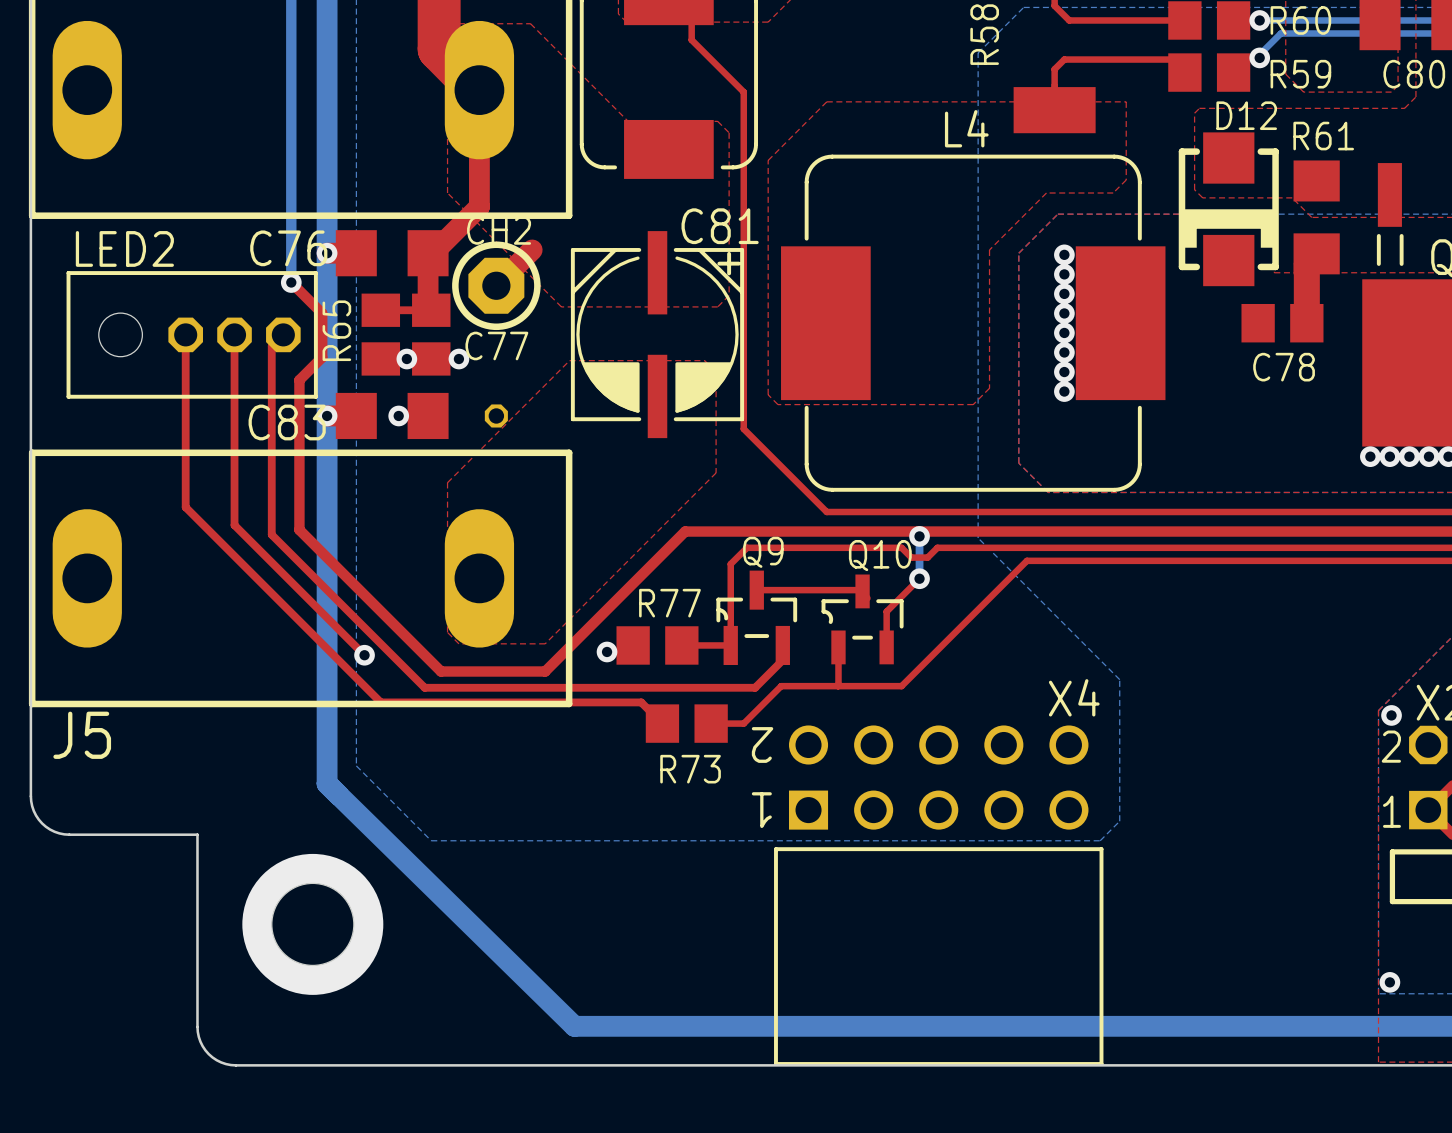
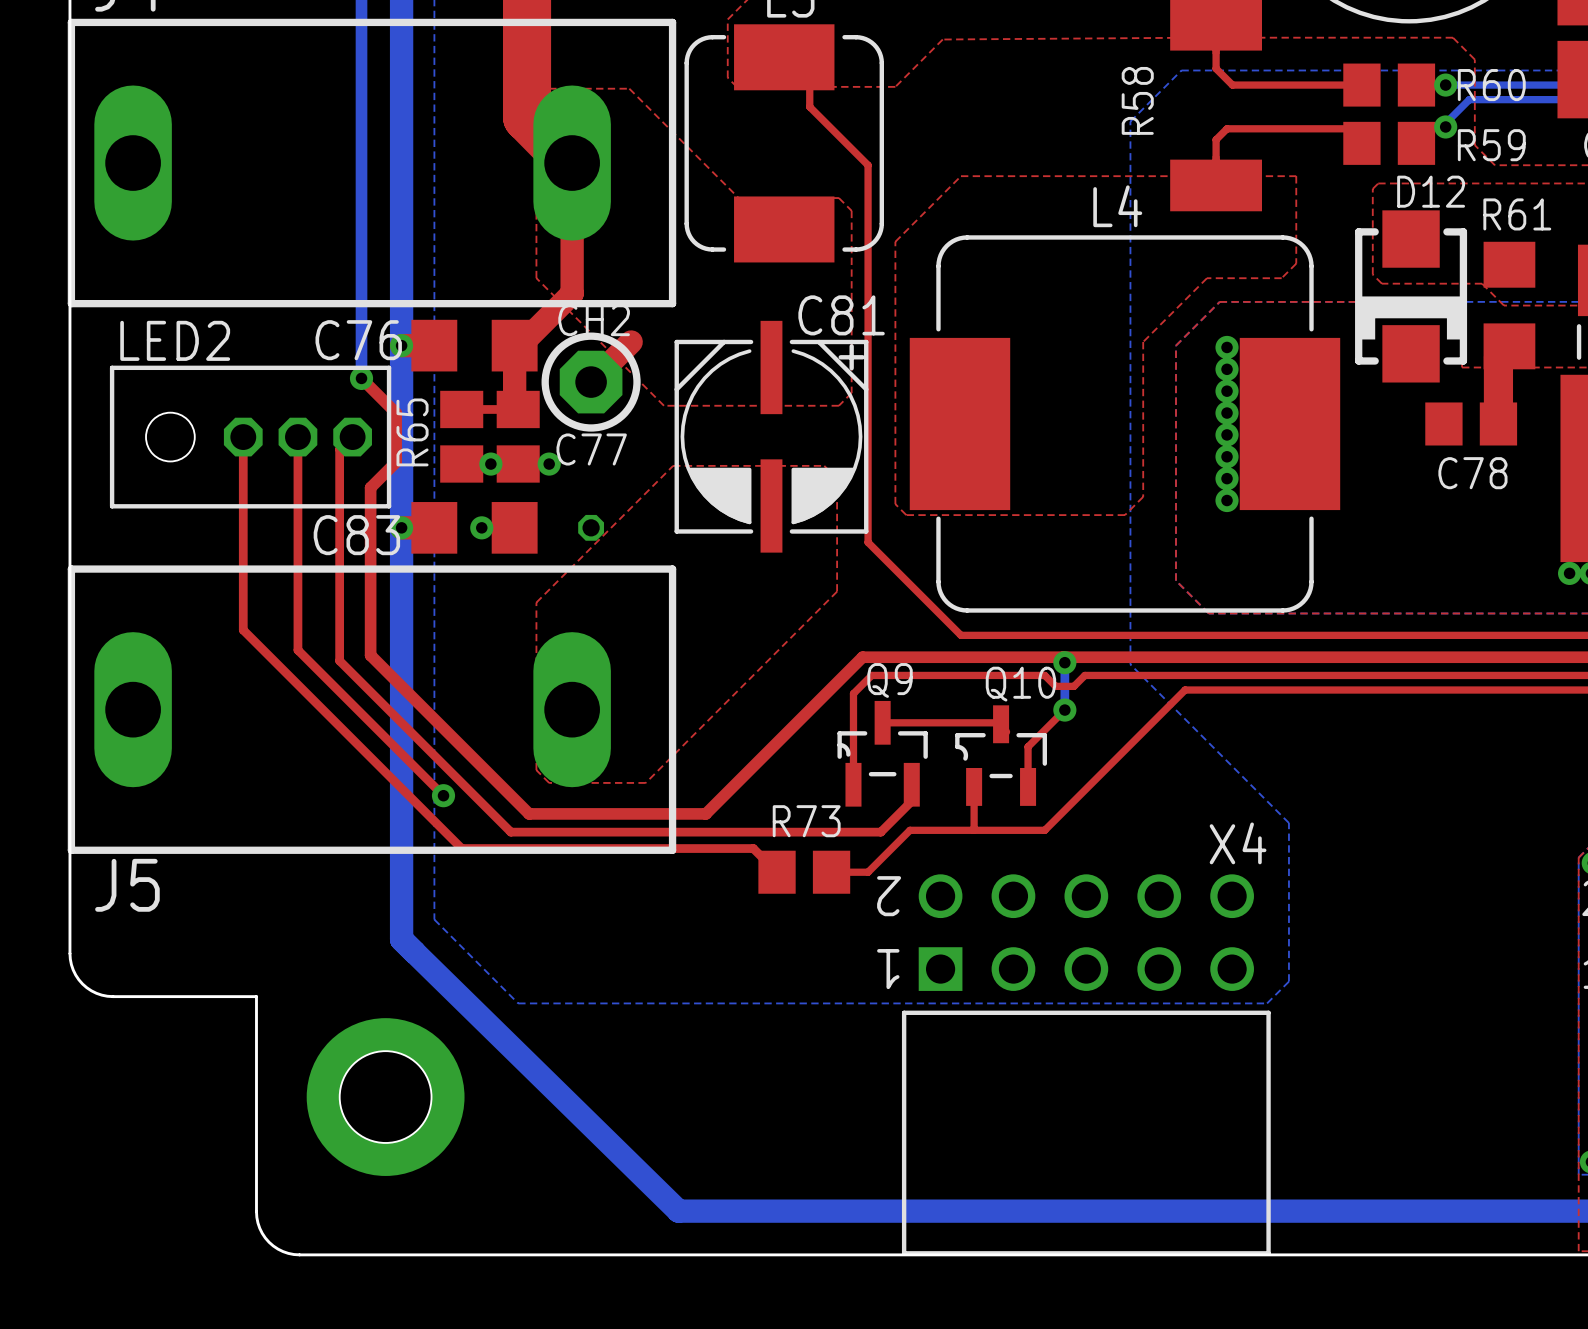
top track: (738, 531) (685, 531) (545, 671) -> (862, 657) (705, 813) (645, 813)
R77: (657, 645) -> none
top track: (681, 645) (730, 645) -> none
via: (607, 651) -> none
R73 name position: R73 (690, 769) -> R73 (806, 821)

